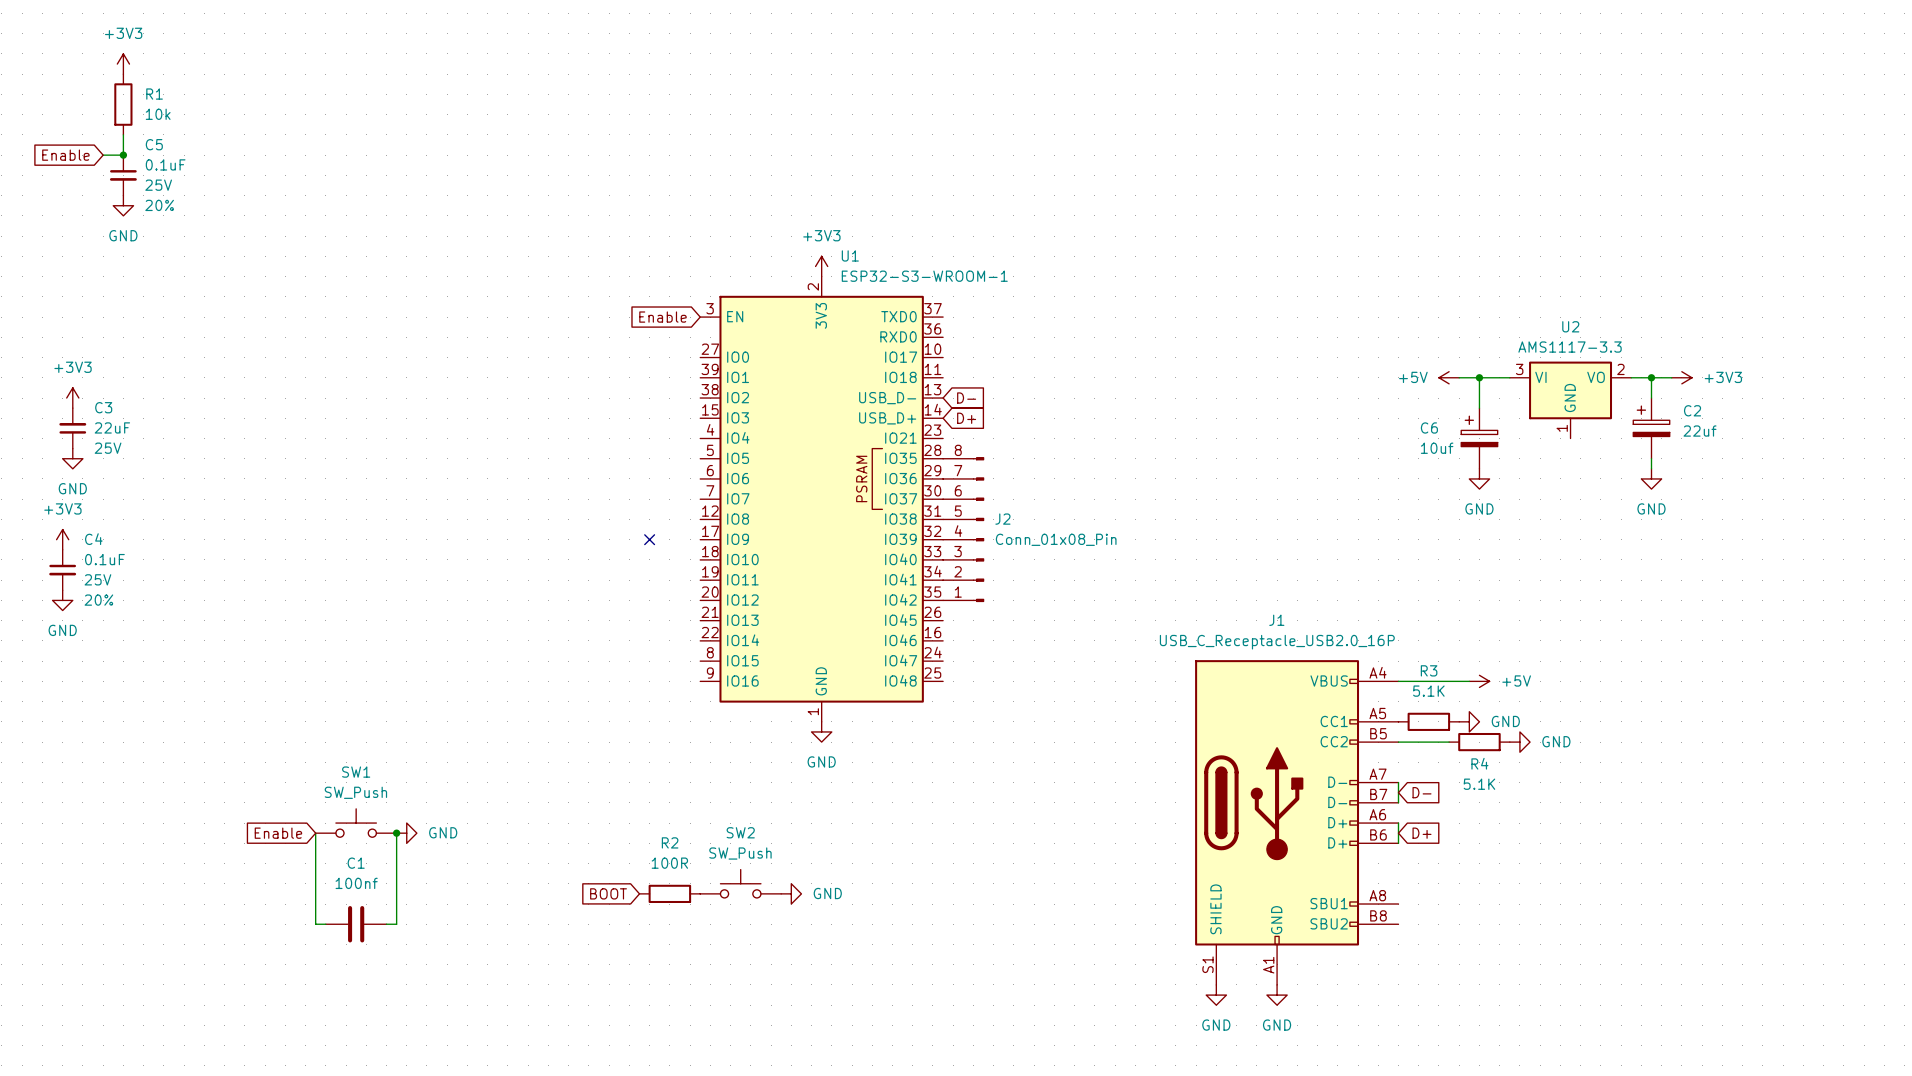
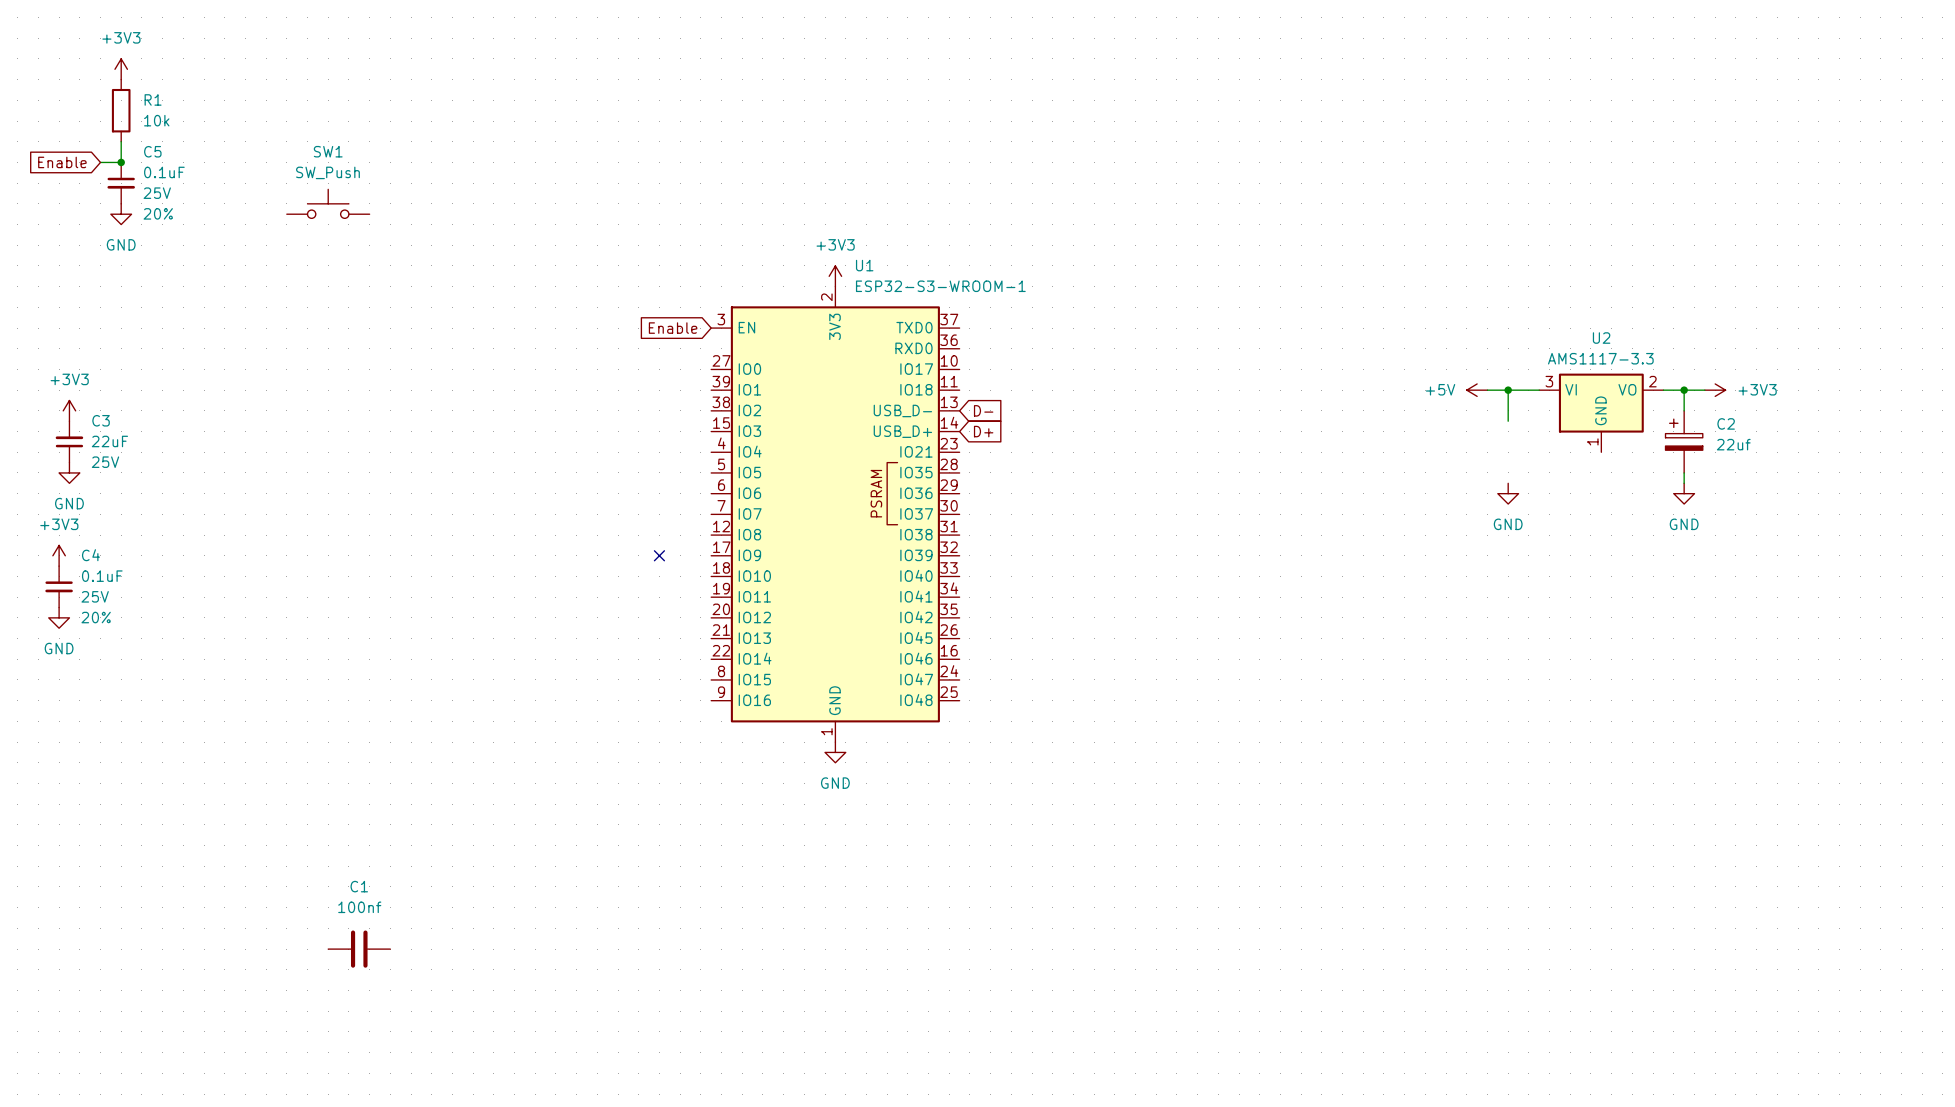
C6: 10uf (1479, 438) -> none
J2: Conn_01x08_Pin (963, 529) -> none
wire: (1398, 681) (1469, 681) -> none
power symbol: +5V (1479, 681) -> none
R3: 5.1K (1428, 721) -> none
power symbol: GND (1469, 721) -> none
wire: (1398, 742) (1449, 742) -> none
R4: 5.1K (1479, 742) -> none
power symbol: GND (1519, 742) -> none
wire: (1398, 782) (1398, 802) -> none
global label: D- (1422, 792) -> none
J1: USB_C_Receptacle_USB2.0_16P (1296, 822) -> none
SW1 position: (356, 823) -> (328, 203)
wire: (1398, 823) (1398, 843) -> none
global label: Enable (278, 833) -> none
wire: (315, 833) (315, 924) (325, 924) -> none
wire: (396, 833) (396, 924) (386, 924) -> none
junction: (396, 833) -> none
power symbol: GND (406, 833) -> none
global label: D+ (1422, 833) -> none
SW2: SW_Push (740, 883) -> none
global label: BOOT (608, 893) -> none
R2: 100R (669, 893) -> none
power symbol: GND (791, 893) -> none
power symbol: GND (1216, 995) -> none
power symbol: GND (1277, 995) -> none

